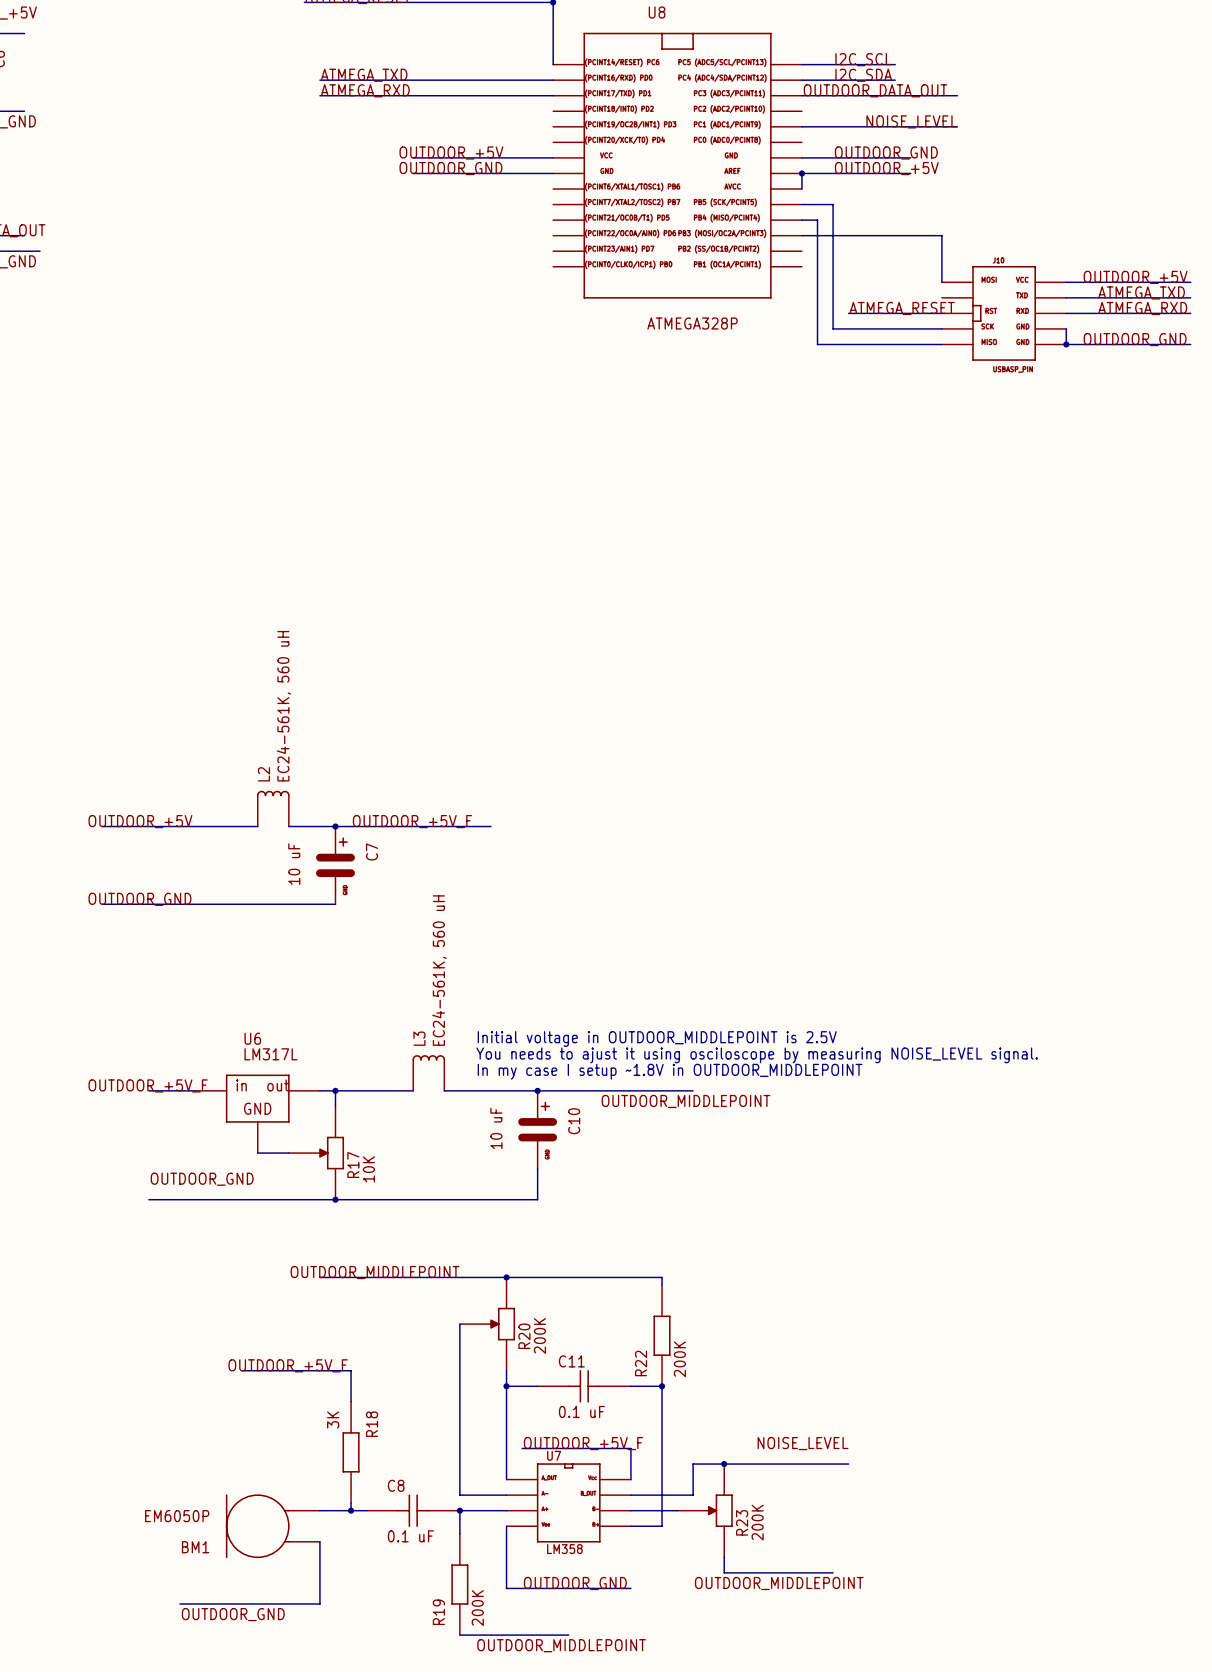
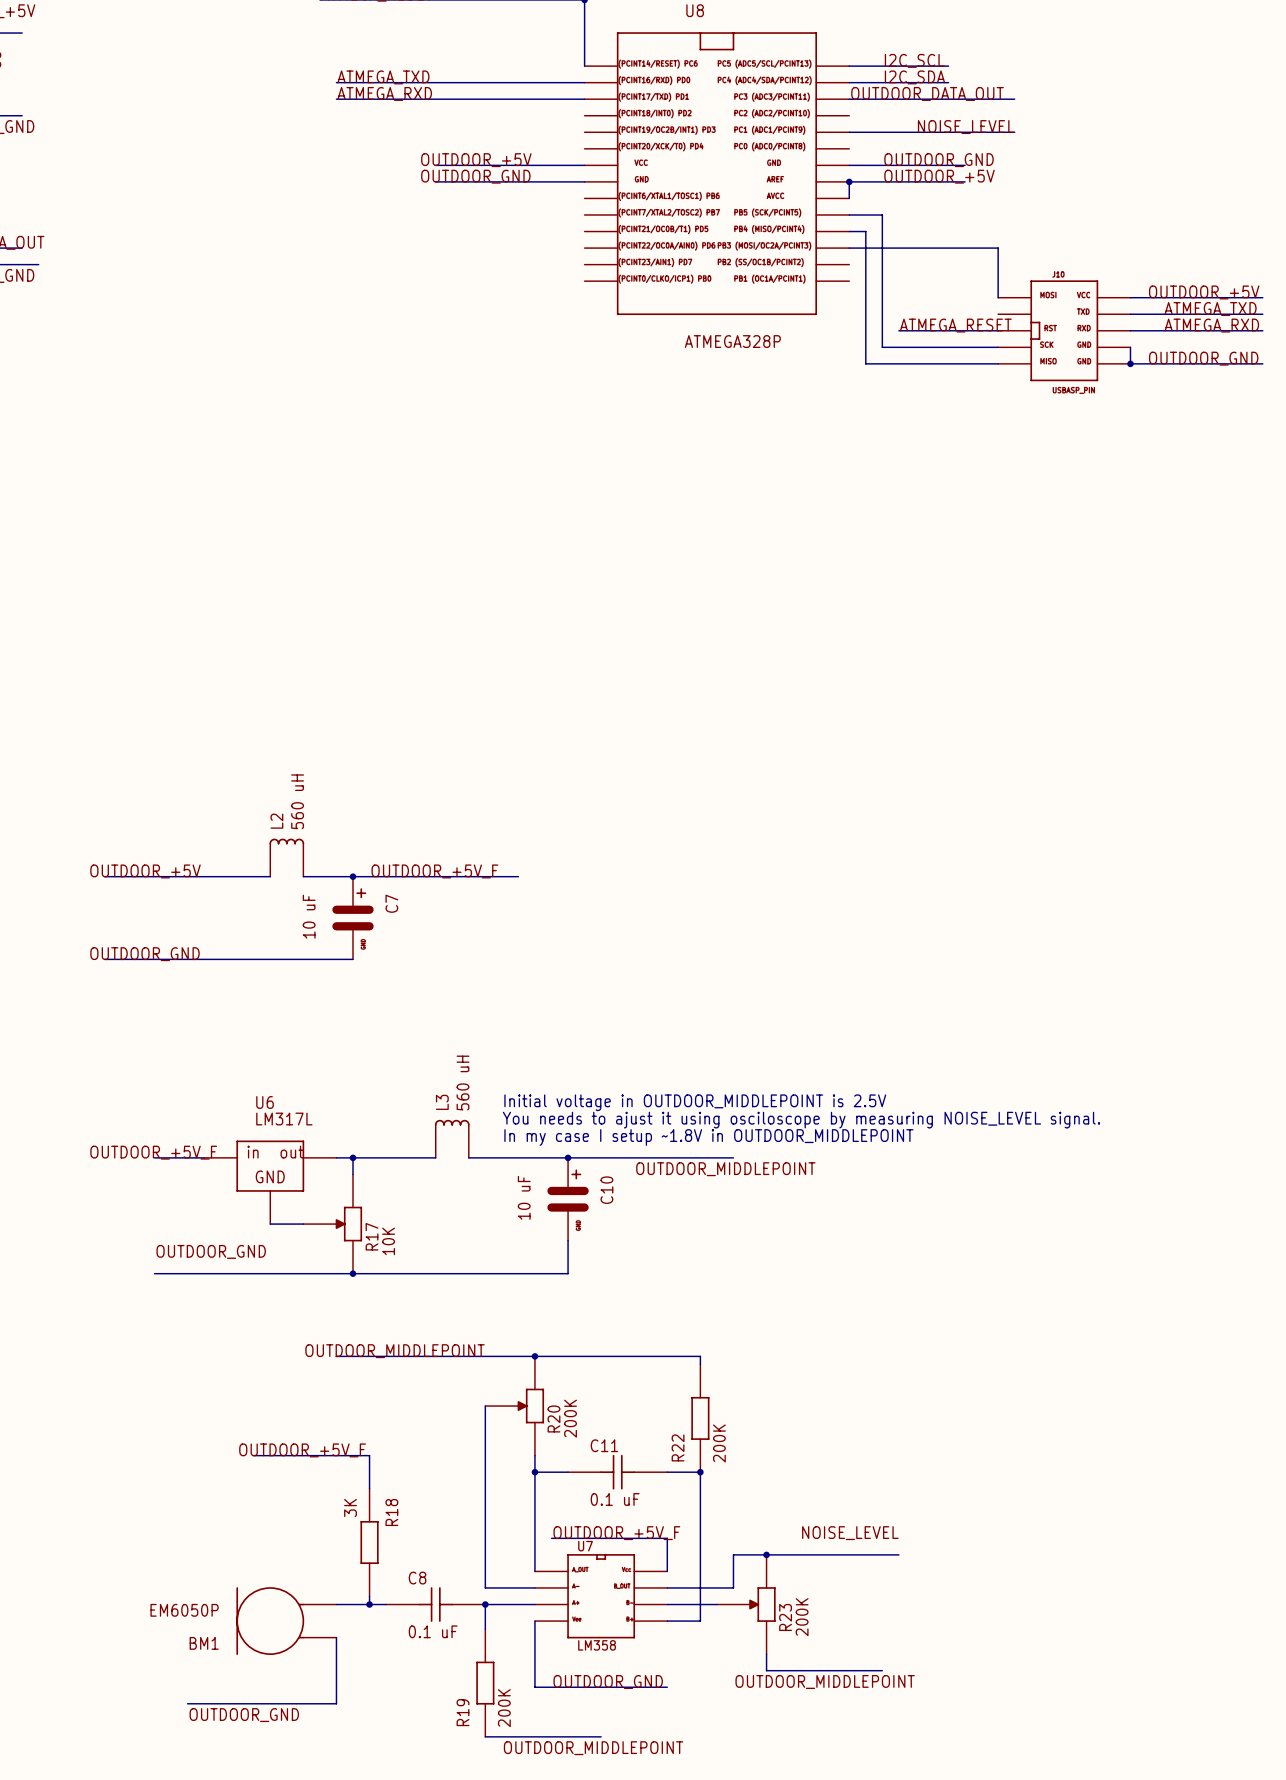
L2 value: EC24-561K, 560 uH (283, 706) -> 560 uH (297, 801)
L3 value: EC24-561K, 560 uH (439, 970) -> 560 uH (463, 1083)

